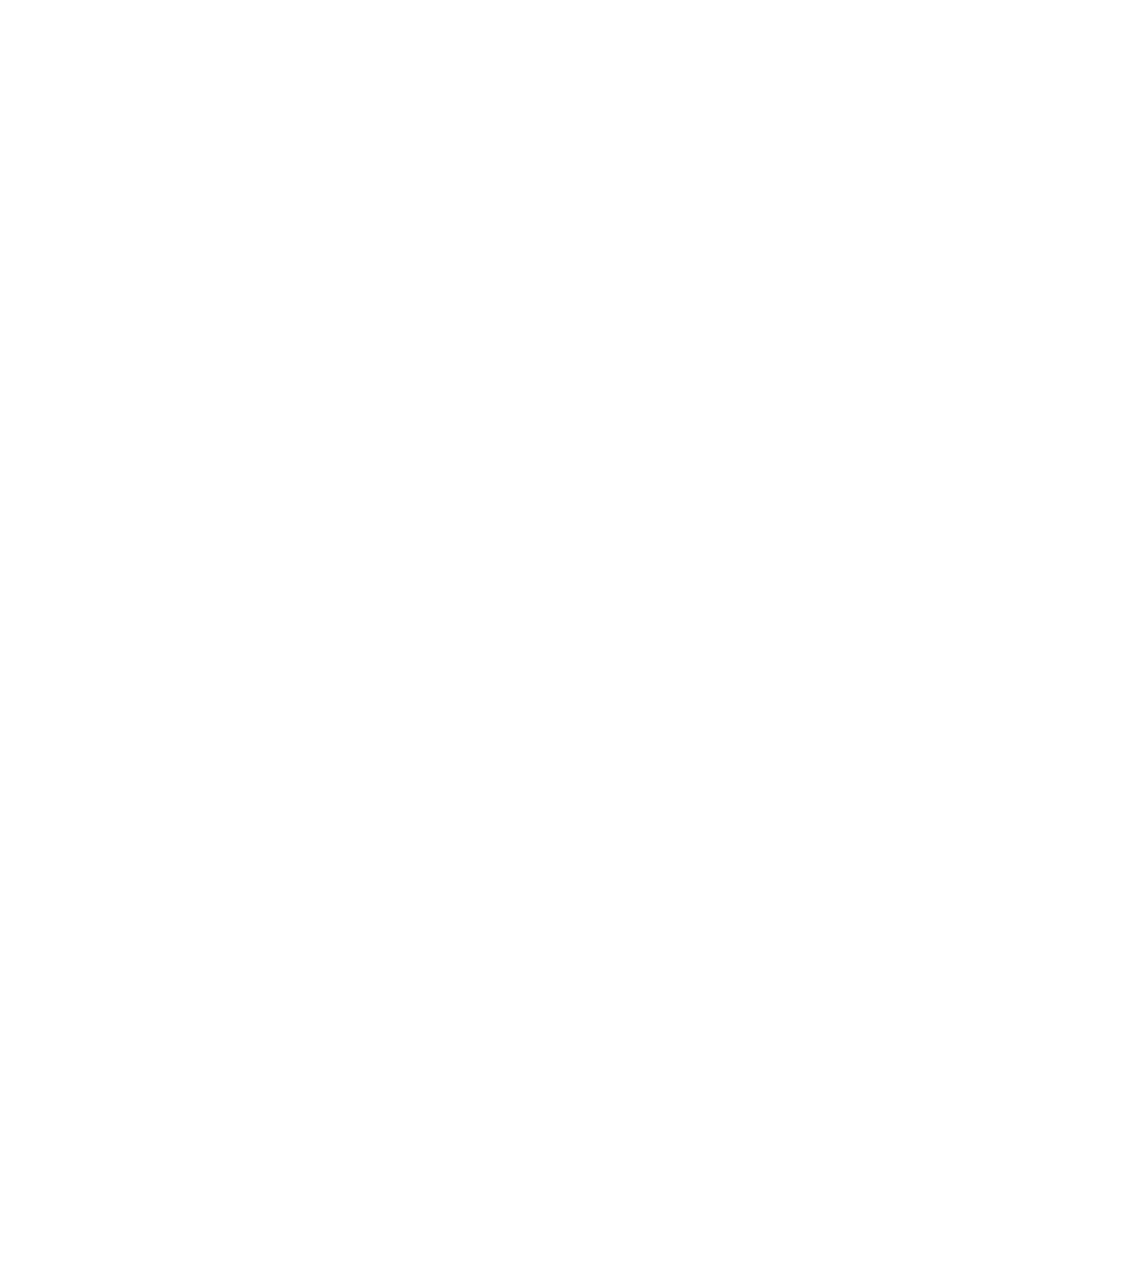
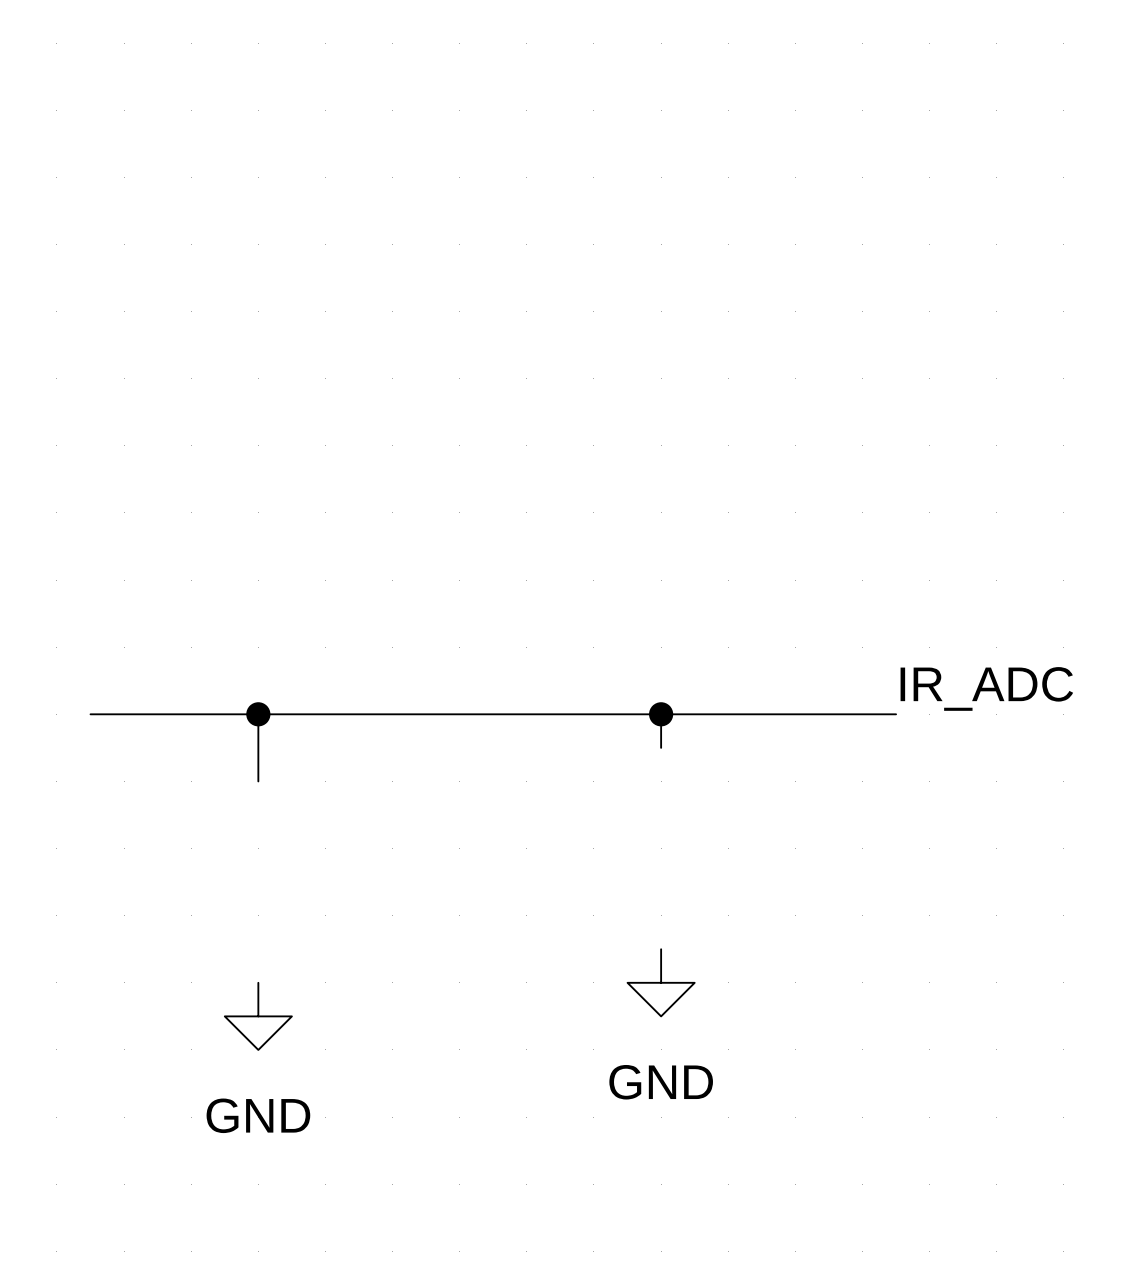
label: none -> IR_ADC (986, 688)
wire: none -> (90, 714) (896, 714)
wire: none -> (258, 714) (258, 781)
junction: none -> (258, 714)
wire: none -> (661, 714) (661, 747)
junction: none -> (661, 714)
power symbol: none -> GND (661, 982)
power symbol: none -> GND (258, 1016)

